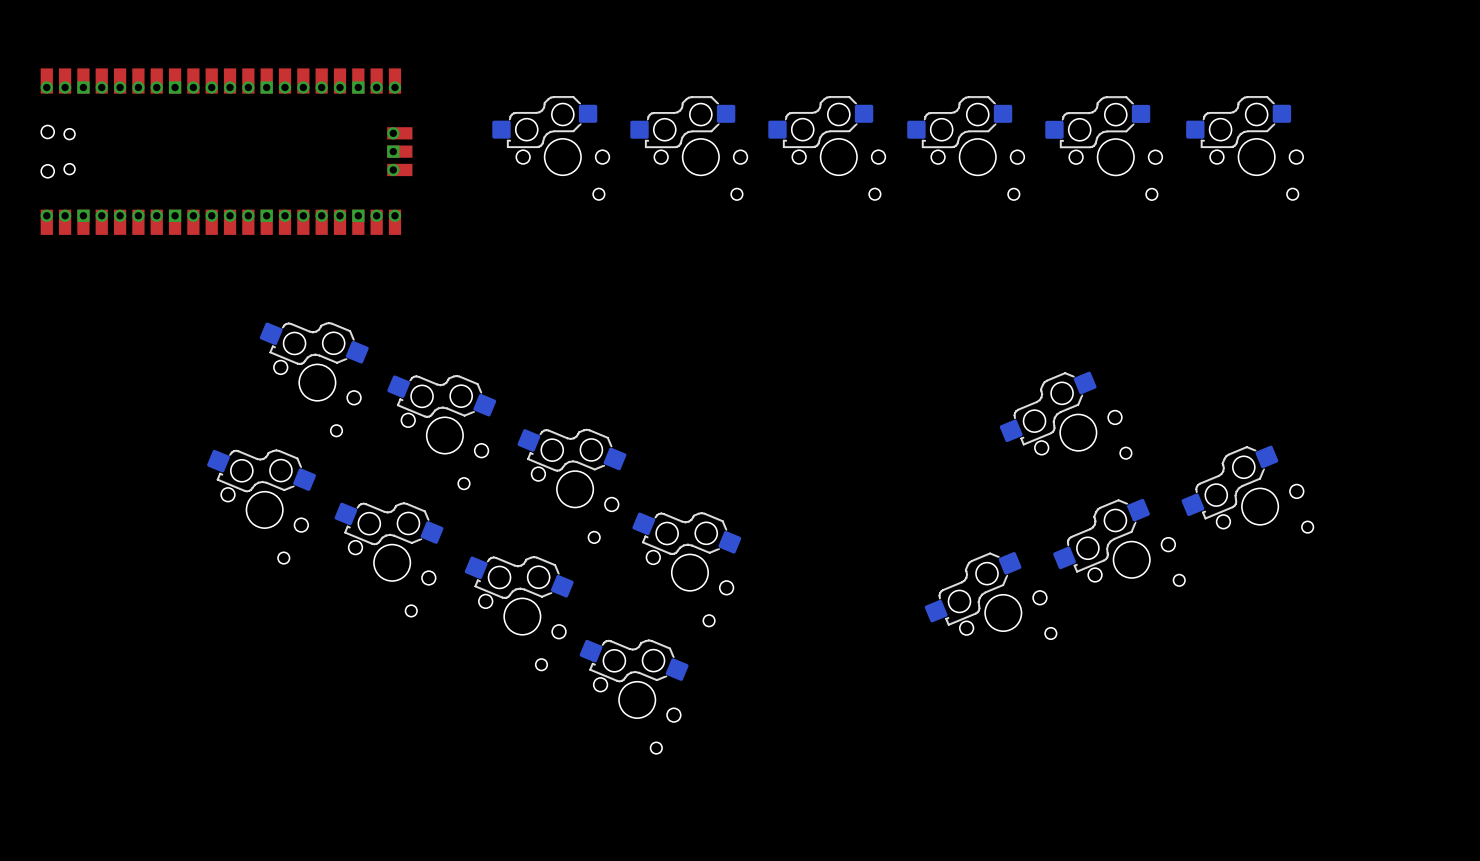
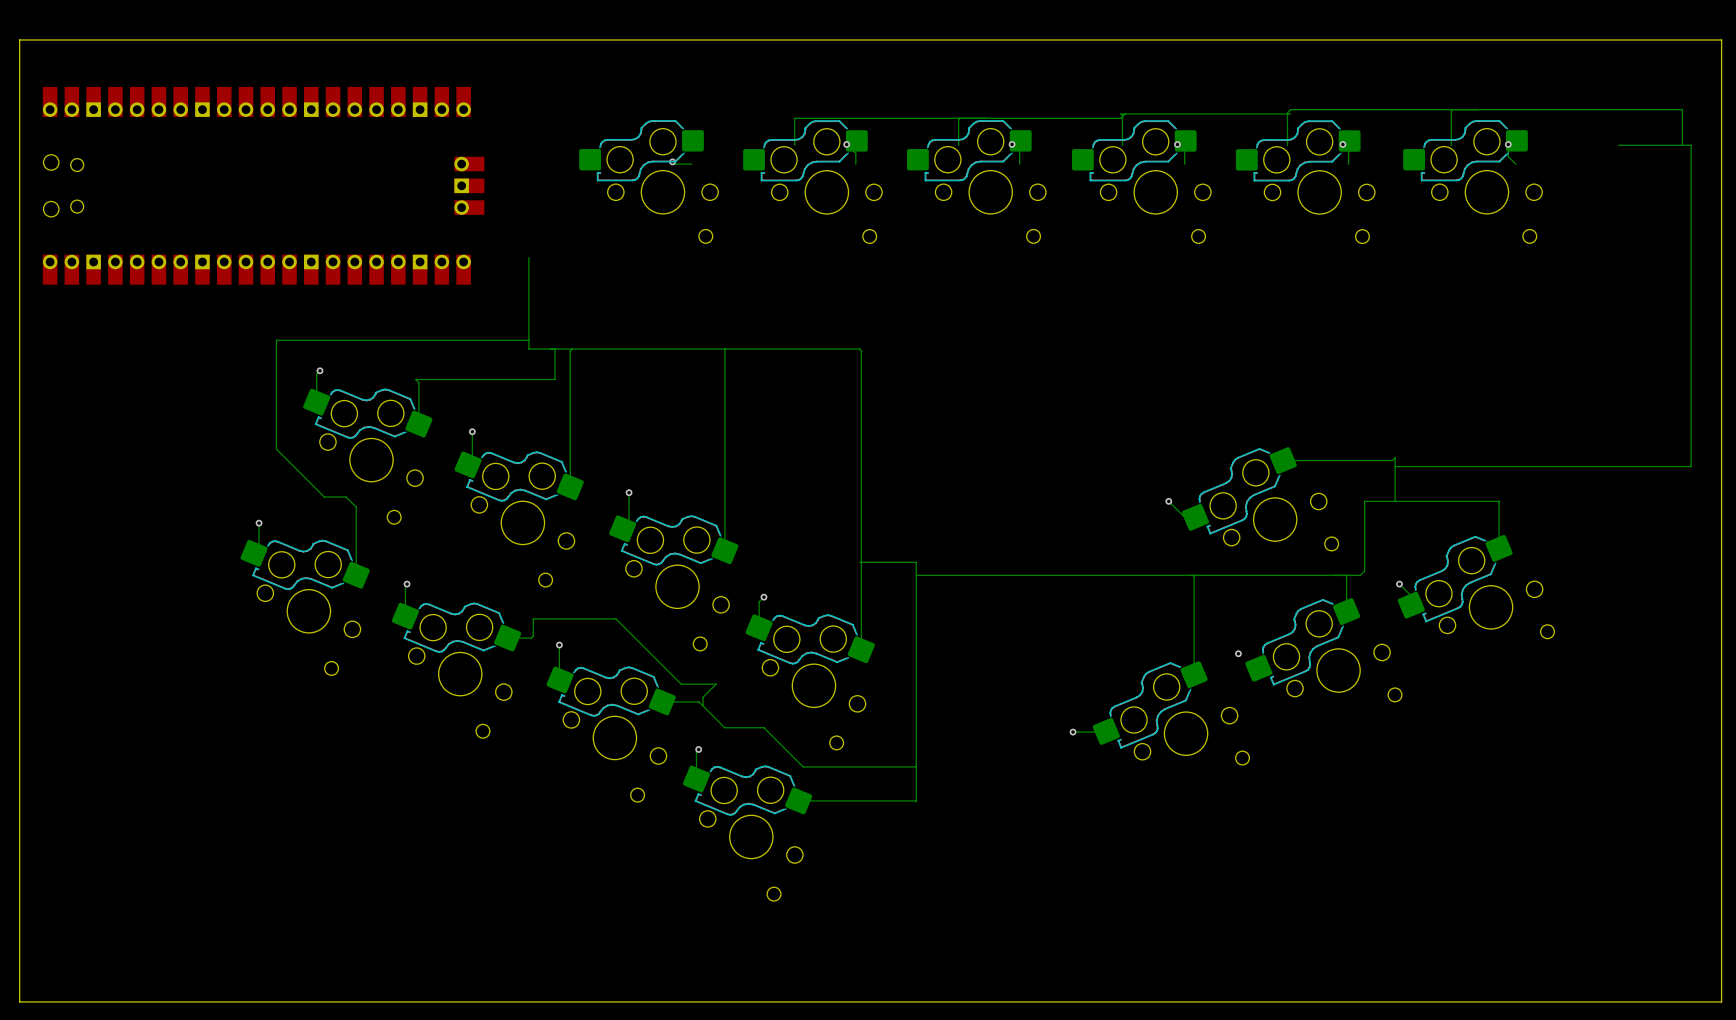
board edge: none -> (1721, 39) (19, 39) (19, 1001) (1721, 1001) (1721, 39)
bottom track: none -> (1451, 109) (1451, 145)
bottom track: none -> (1125, 113) (1120, 118) (794, 118) (794, 145)
bottom track: none -> (1290, 113) (1120, 113) (1122, 145)
bottom track: none -> (959, 118) (958, 145)
bottom track: none -> (846, 144) (855, 153) (855, 164)
via: none -> (846, 144)
bottom track: none -> (1012, 144) (1019, 152) (1019, 164)
via: none -> (1012, 144)
bottom track: none -> (1177, 144) (1184, 151) (1184, 164)
via: none -> (1177, 144)
bottom track: none -> (1342, 144) (1348, 150) (1348, 164)
via: none -> (1342, 144)
bottom track: none -> (1508, 144) (1508, 156) (1515, 164)
via: none -> (1508, 144)
bottom track: none -> (1618, 145) (1691, 145) (1691, 466) (1395, 466)
bottom track: none -> (1682, 145) (1682, 109) (1290, 109) (1287, 112) (1287, 145)
bottom track: none -> (672, 161) (674, 164) (691, 164)
via: none -> (672, 161)
bottom track: none -> (528, 257) (528, 349) (859, 349) (861, 350) (861, 649)
bottom track: none -> (528, 340) (276, 340) (276, 449) (324, 497) (346, 497) (356, 507) (356, 575)
bottom track: none -> (550, 349) (555, 349) (555, 379) (415, 379) (418, 382) (418, 424)
bottom track: none -> (572, 349) (570, 351) (570, 486)
bottom track: none -> (724, 349) (724, 550)
bottom track: none -> (319, 370) (316, 374) (316, 402)
via: none -> (319, 370)
bottom track: none -> (472, 431) (472, 460) (468, 464)
via: none -> (472, 431)
bottom track: none -> (1283, 460) (1392, 460) (1395, 457) (1395, 501)
bottom track: none -> (629, 492) (629, 522) (622, 528)
via: none -> (629, 492)
bottom track: none -> (1168, 501) (1184, 517) (1195, 517)
via: none -> (1168, 501)
bottom track: none -> (259, 523) (259, 548) (254, 553)
via: none -> (259, 523)
bottom track: none -> (1499, 548) (1499, 501) (1364, 501) (1364, 571) (1360, 575) (916, 575)
bottom track: none -> (859, 562) (916, 562) (916, 801) (798, 800)
bottom track: none -> (1194, 575) (1194, 674)
bottom track: none -> (1347, 575) (1346, 611)
bottom track: none -> (407, 584) (405, 585) (405, 616)
via: none -> (407, 584)
bottom track: none -> (1399, 584) (1411, 595) (1411, 605)
via: none -> (1399, 584)
bottom track: none -> (763, 597) (759, 602) (759, 627)
via: none -> (763, 597)
bottom track: none -> (507, 638) (531, 638) (533, 636) (533, 618) (615, 618) (681, 684) (716, 684) (703, 697) (703, 705)
bottom track: none -> (559, 645) (560, 680)
via: none -> (559, 645)
via: none -> (1238, 653)
bottom track: none -> (662, 701) (698, 701) (724, 727) (763, 727) (803, 766) (916, 766)
via: none -> (1073, 732)
bottom track: none -> (1106, 731) (1073, 732)
bottom track: none -> (698, 749) (696, 751) (696, 779)
via: none -> (698, 749)

